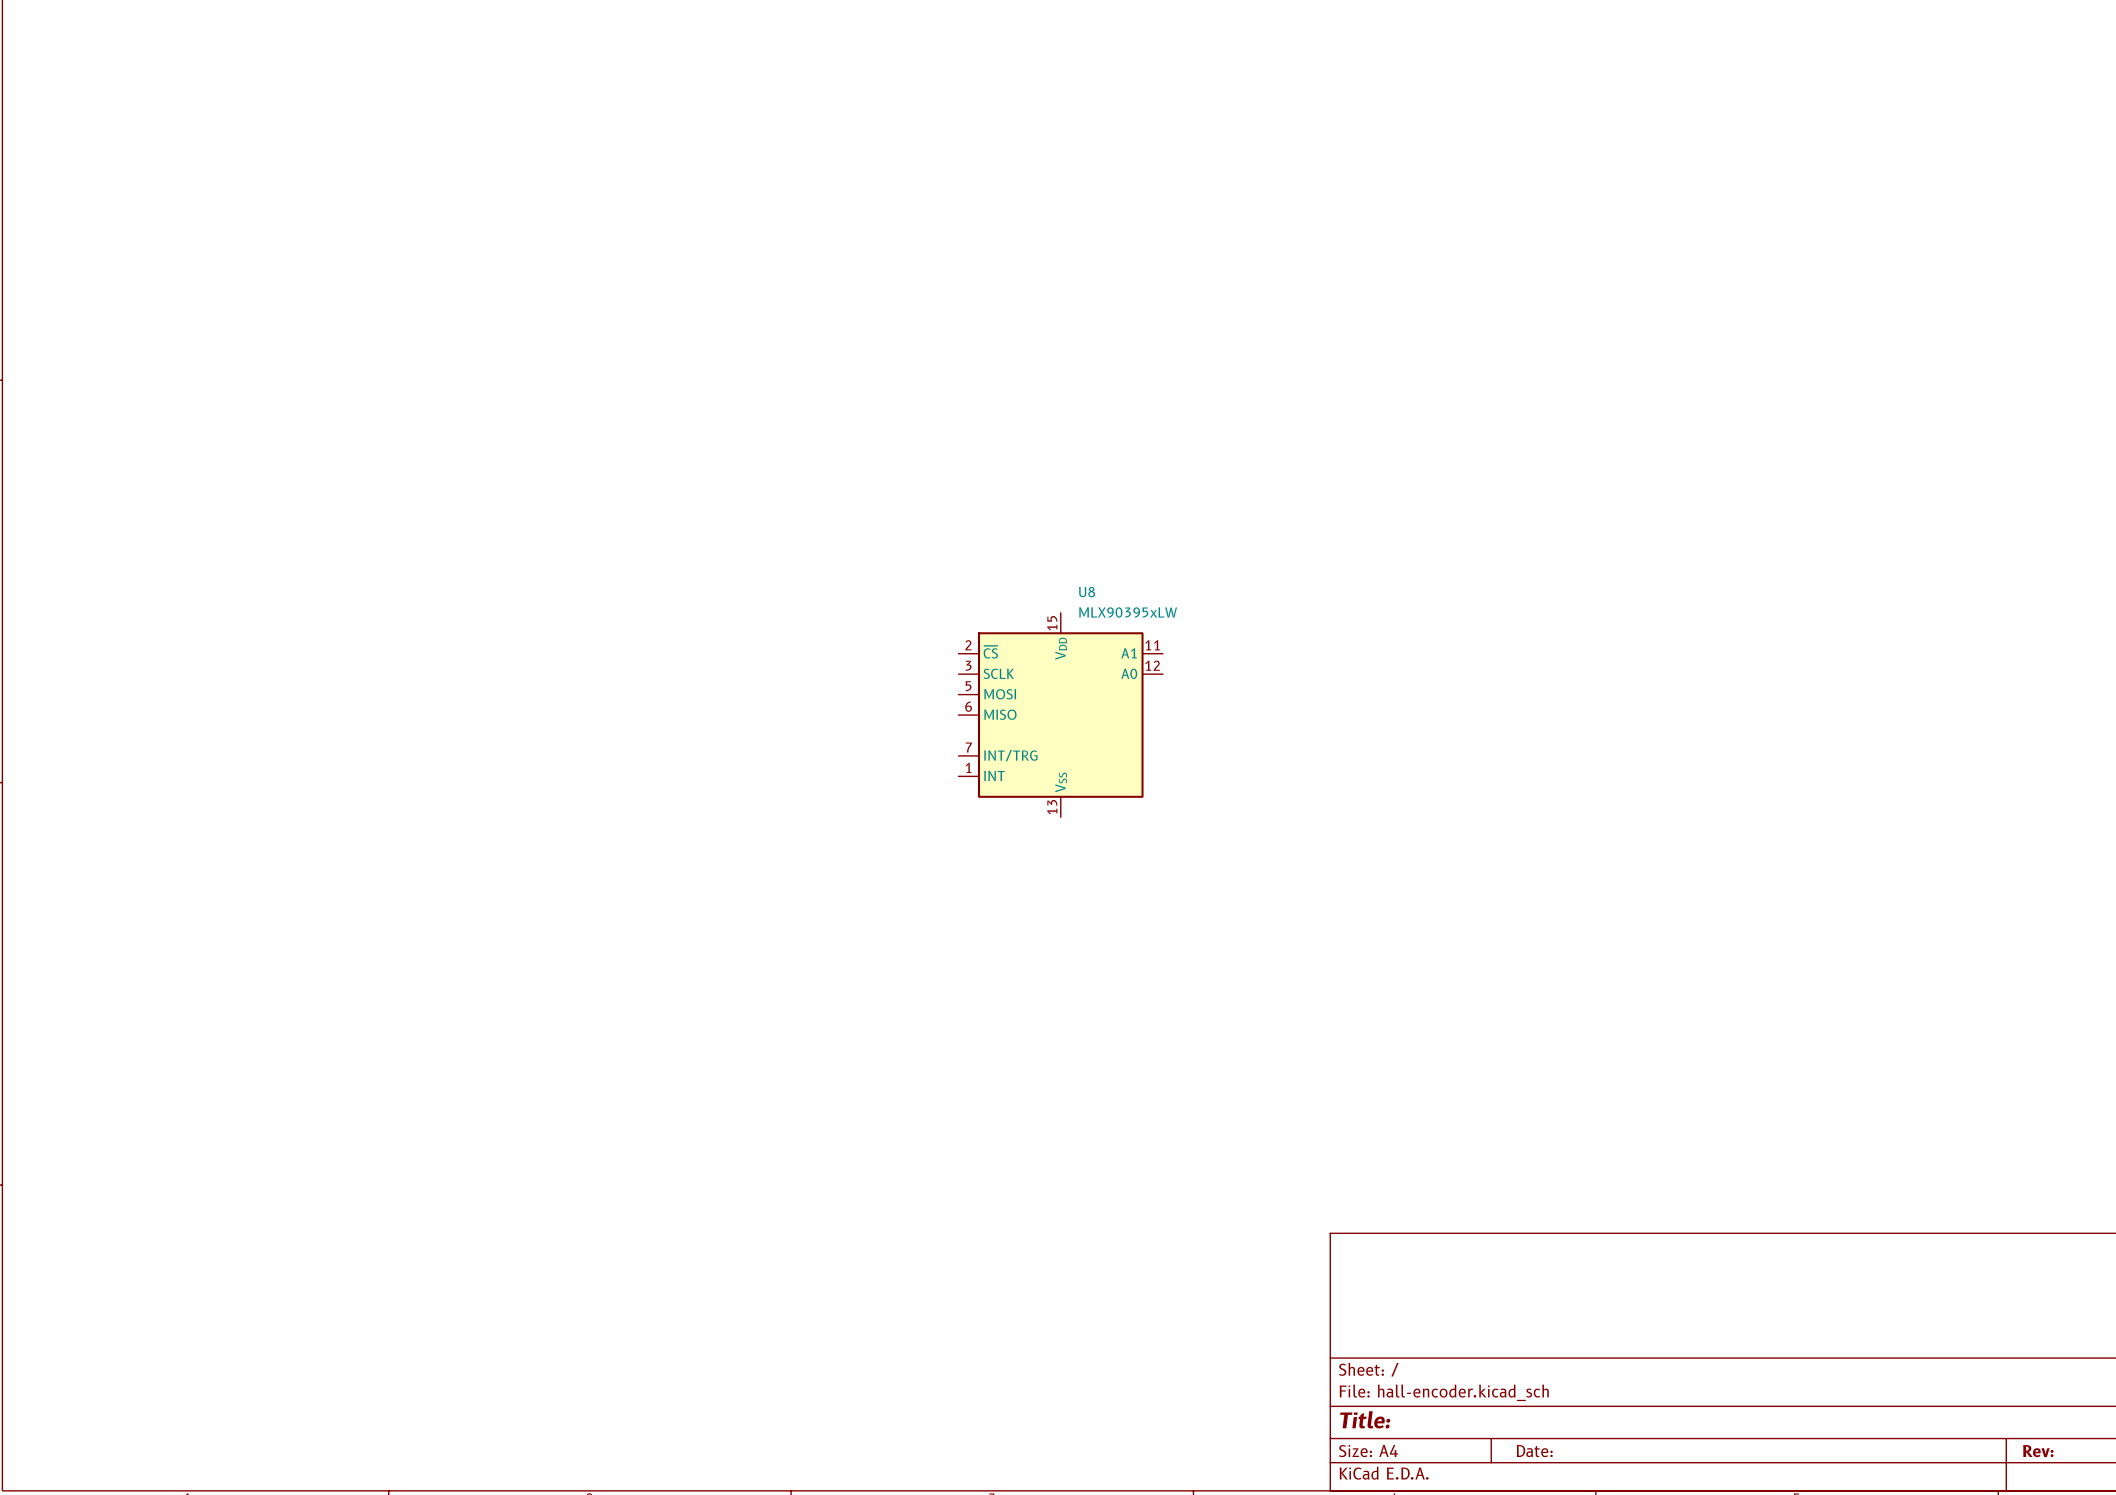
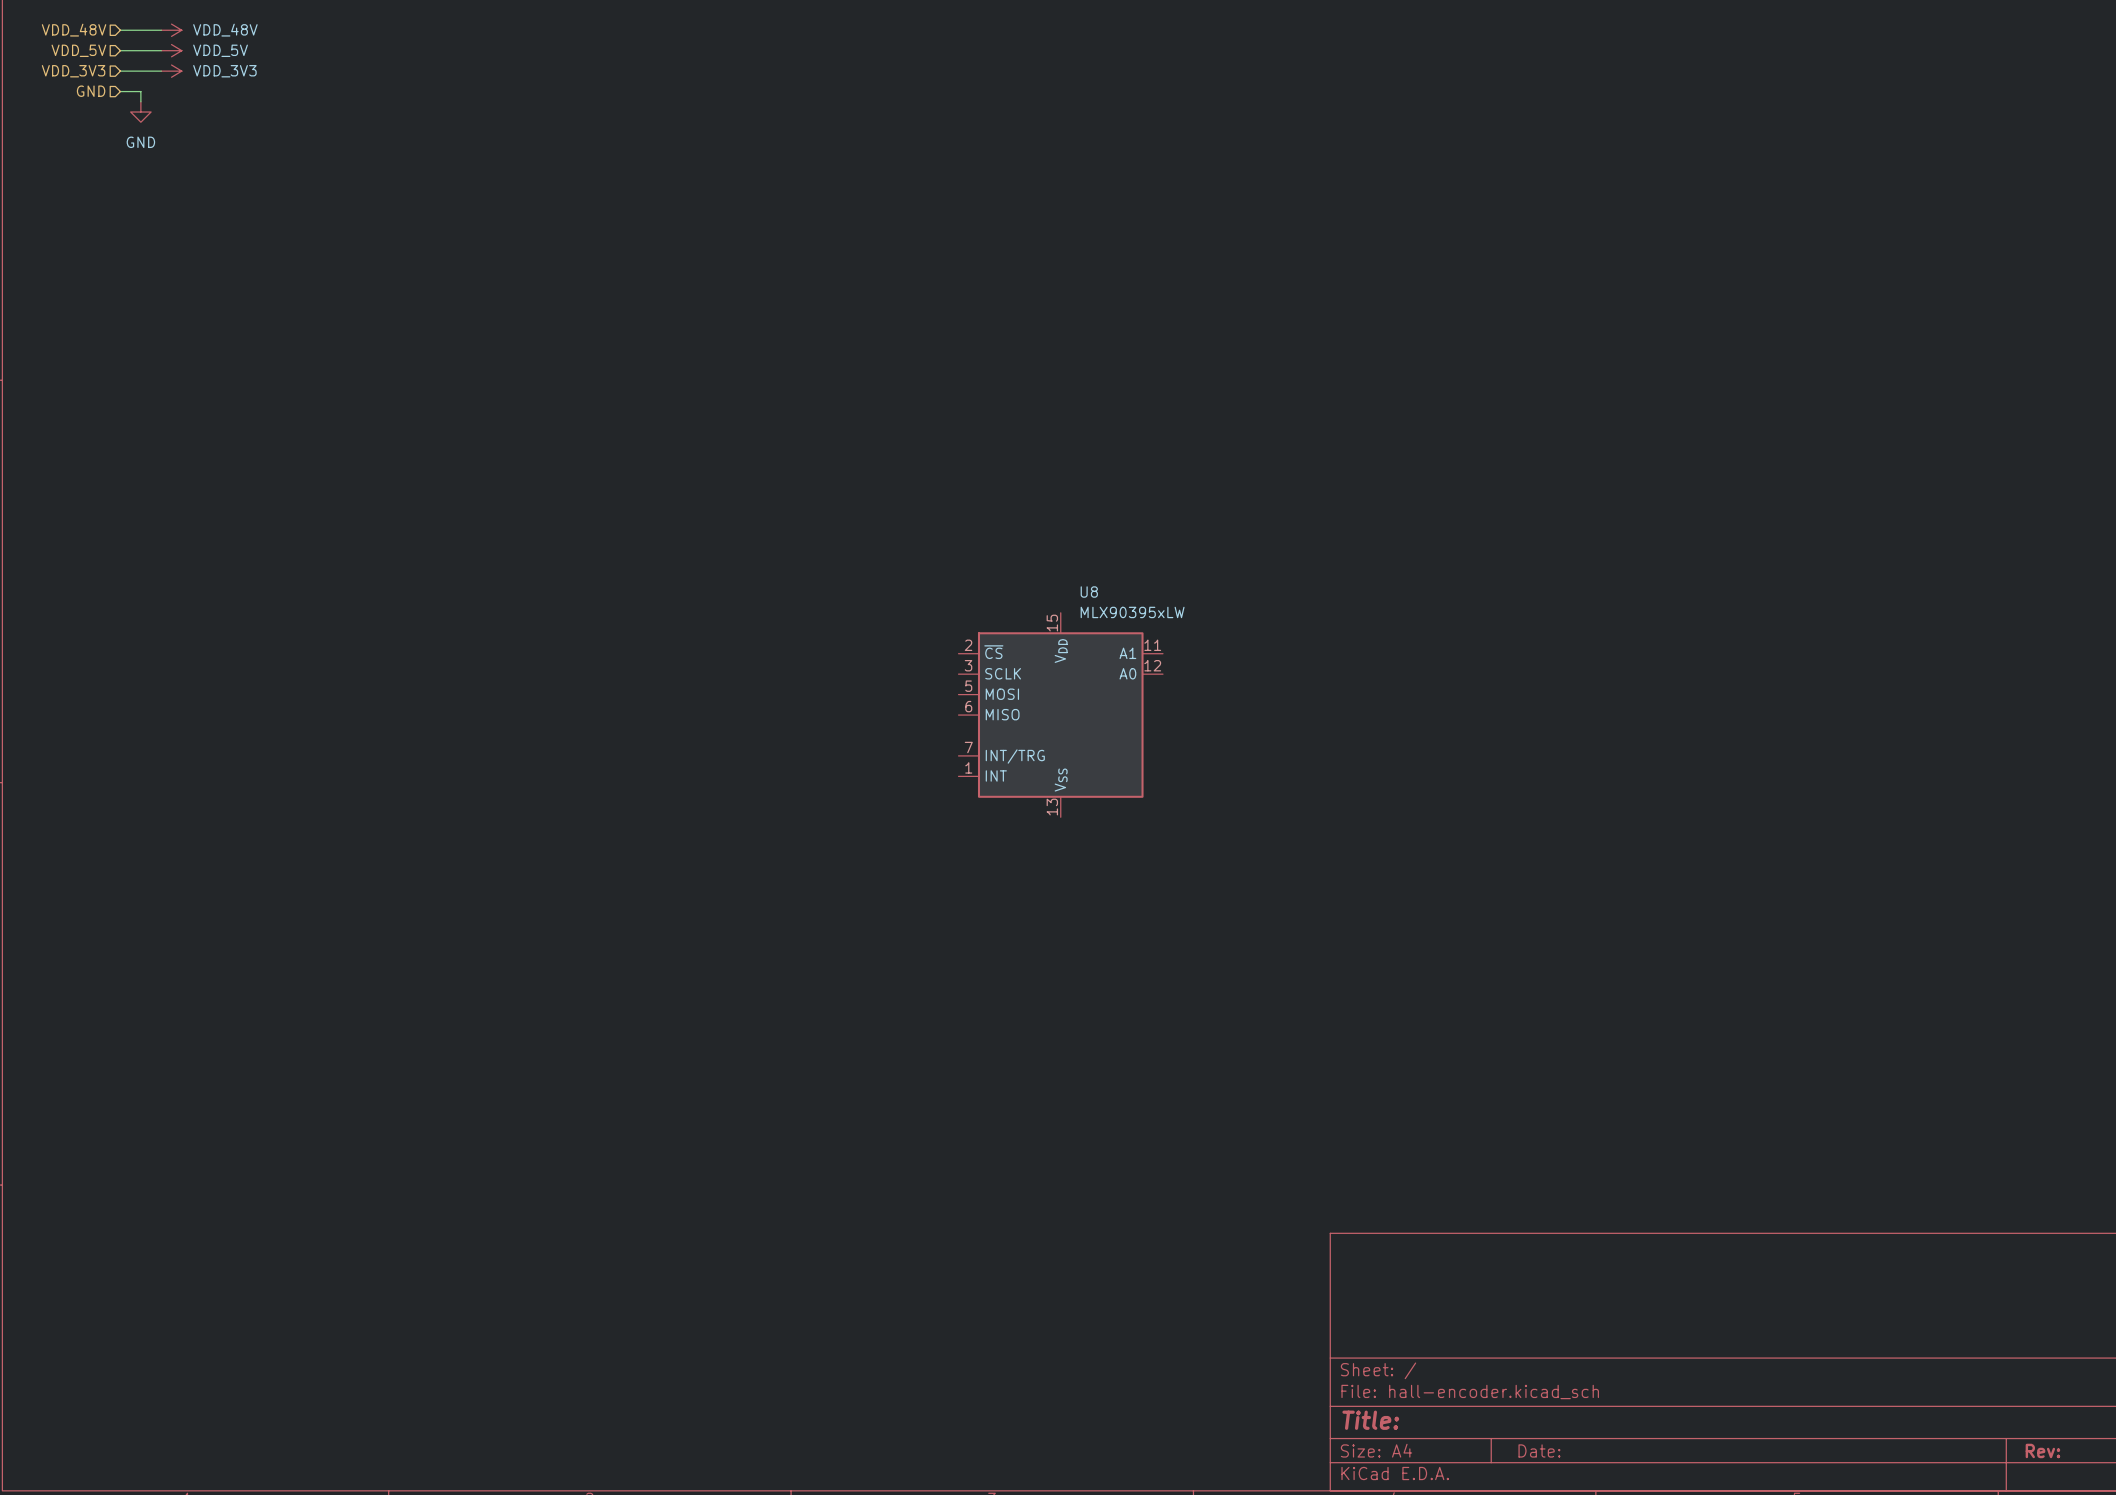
wire: none -> (120, 30) (161, 30)
power symbol: none -> VDD_48V (171, 30)
hierarchical label: none -> VDD_48V (74, 30)
wire: none -> (120, 50) (161, 50)
power symbol: none -> VDD_5V (171, 50)
hierarchical label: none -> VDD_5V (78, 50)
wire: none -> (120, 71) (161, 71)
power symbol: none -> VDD_3V3 (171, 71)
hierarchical label: none -> VDD_3V3 (73, 71)
hierarchical label: none -> GND (91, 91)
wire: none -> (120, 91) (140, 91) (140, 101)
power symbol: none -> GND (140, 112)

